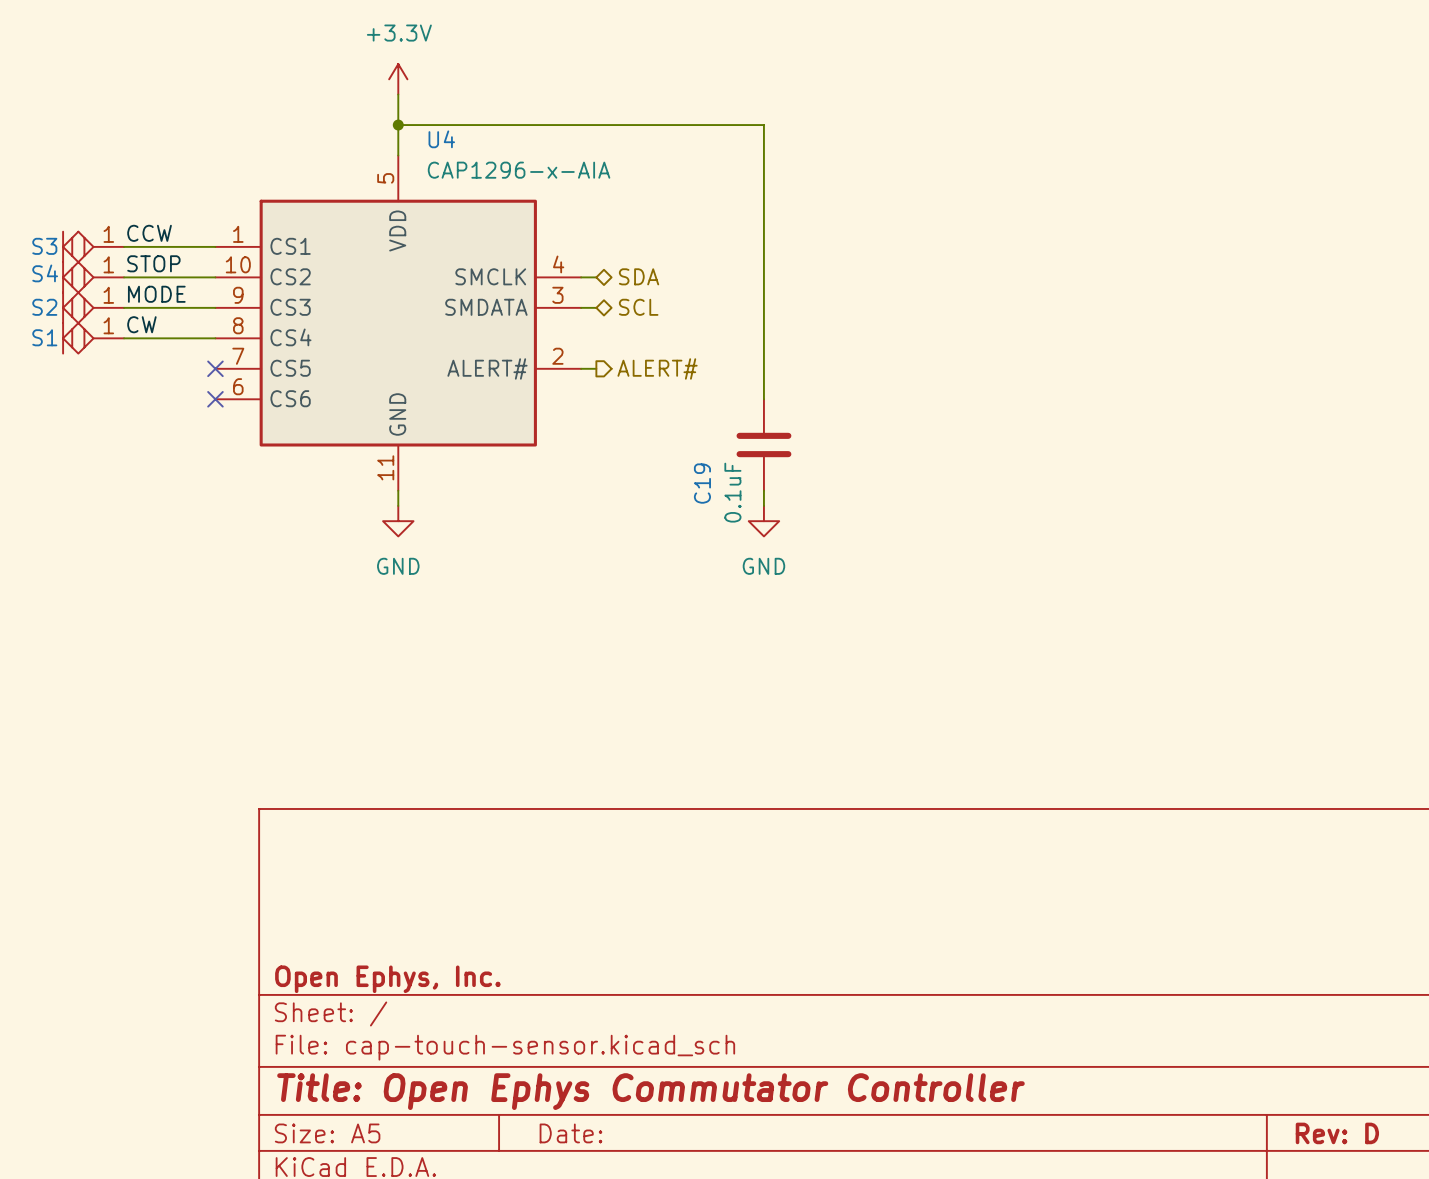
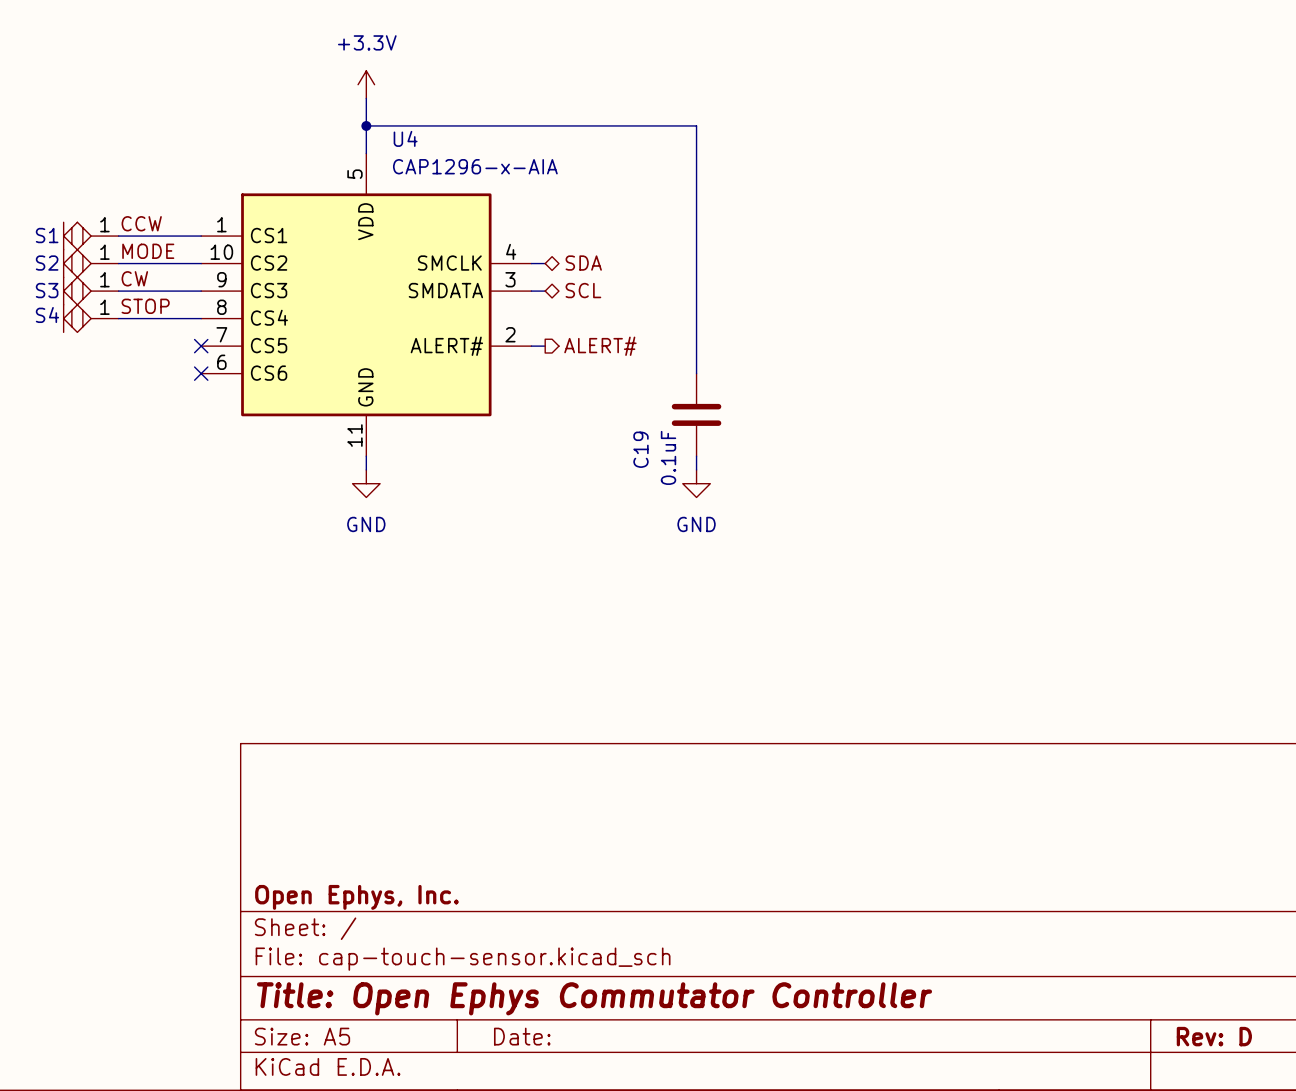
S3 name: S3 (44, 246) -> S1 (47, 235)
label: STOP (153, 263) -> MODE (148, 251)
S4 name: S4 (45, 273) -> S2 (47, 263)
label: MODE (156, 294) -> CW (134, 278)
S2 name: S2 (44, 307) -> S3 (47, 290)
label: CW (141, 324) -> STOP (145, 306)
S1 name: S1 (44, 337) -> S4 (47, 315)

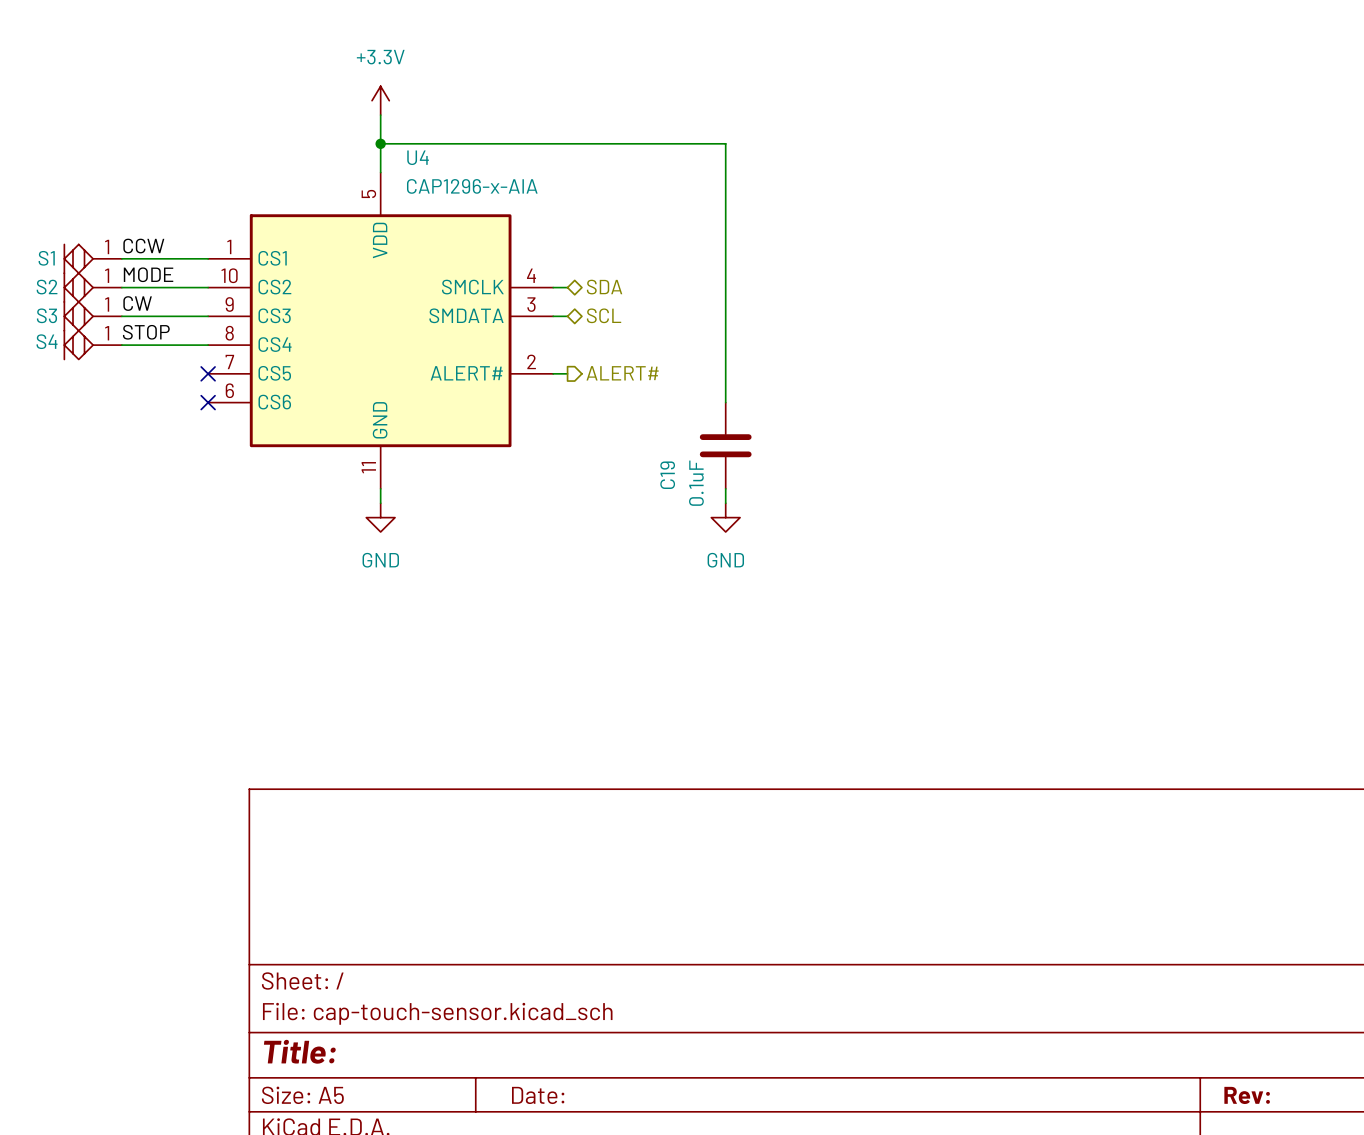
title block: Open Ephys, Inc. (356, 897) -> none
title block: Title: Open Ephys Commutator Controller (594, 998) -> Title: (299, 1051)
title block: Rev: D (1214, 1036) -> Rev: (1247, 1095)

